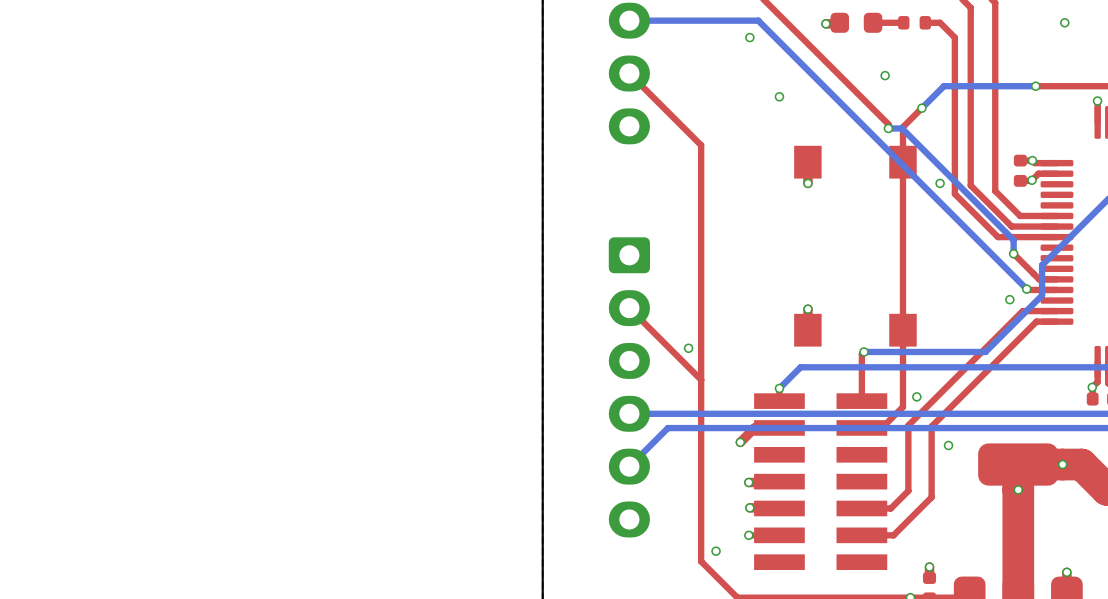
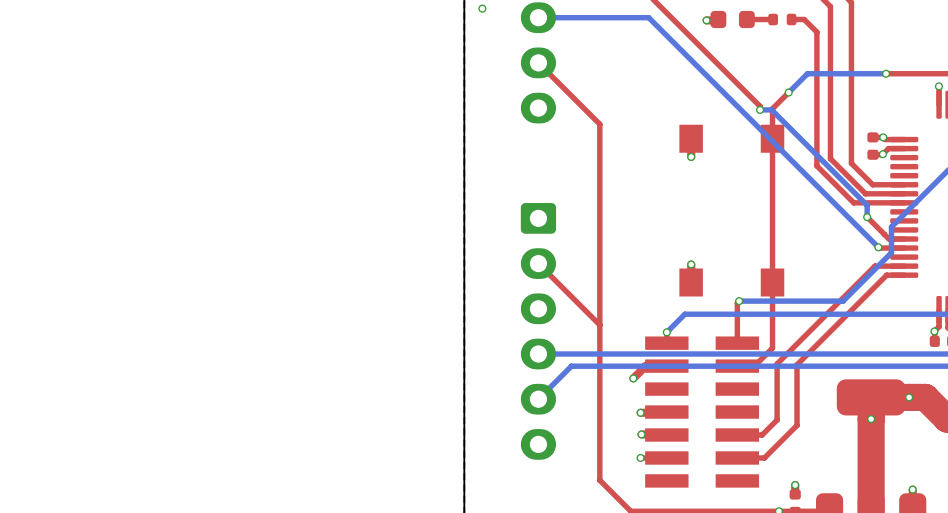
via: none -> (482, 8)
via: (1064, 22) -> none
via: (749, 37) -> none
via: (885, 75) -> none
via: (779, 96) -> none
via: (940, 183) -> none
via: (1009, 299) -> none
via: (688, 348) -> none
via: (916, 396) -> none
via: (948, 445) -> none
via: (716, 551) -> none

